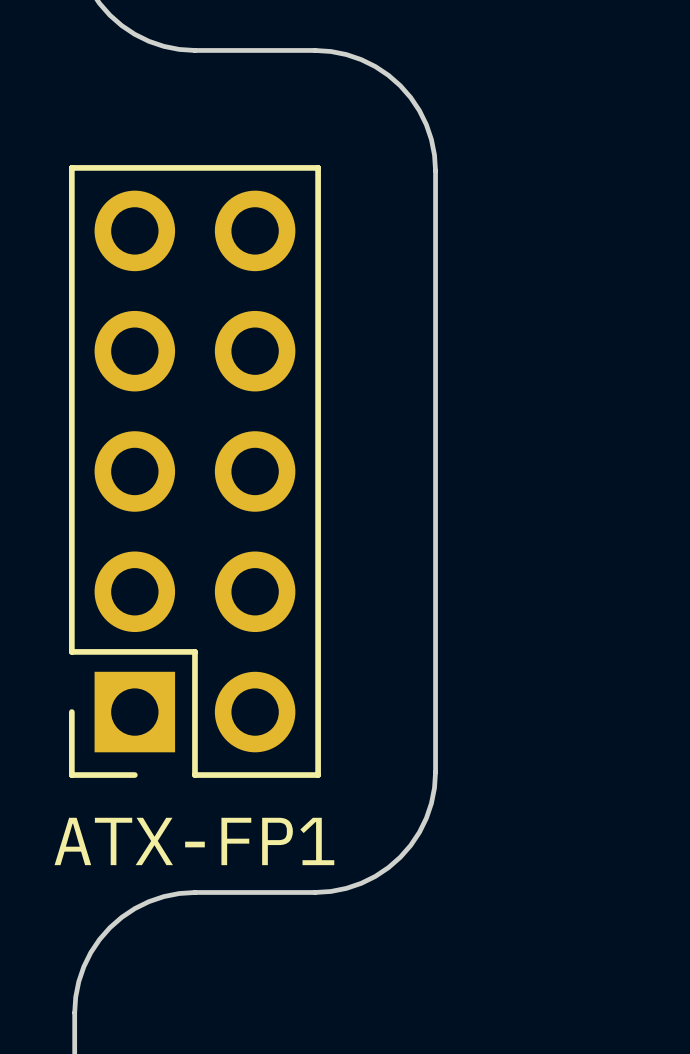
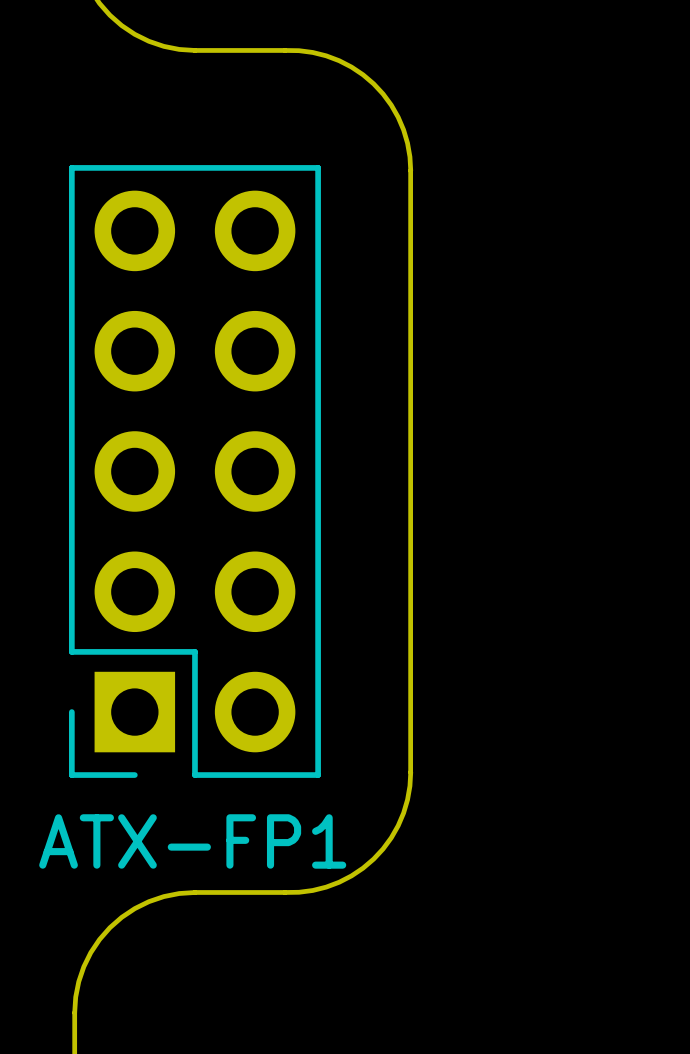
board edge: (285, 50) (330, 51) (346, 54) (375, 66) (388, 75) (410, 97) (426, 124) (431, 139) (435, 170) (435, 772) (431, 803) (419, 832) (410, 845) (388, 867) (375, 876) (361, 883) (330, 891) (285, 892) -> (285, 50) (299, 50) (326, 55) (351, 67) (373, 83) (391, 105) (403, 129) (407, 143) (410, 170)
board edge: none -> (410, 170) (410, 772)
board edge: none -> (410, 772) (407, 799) (398, 825) (383, 848) (373, 859) (351, 875) (339, 882) (312, 890) (285, 892)

